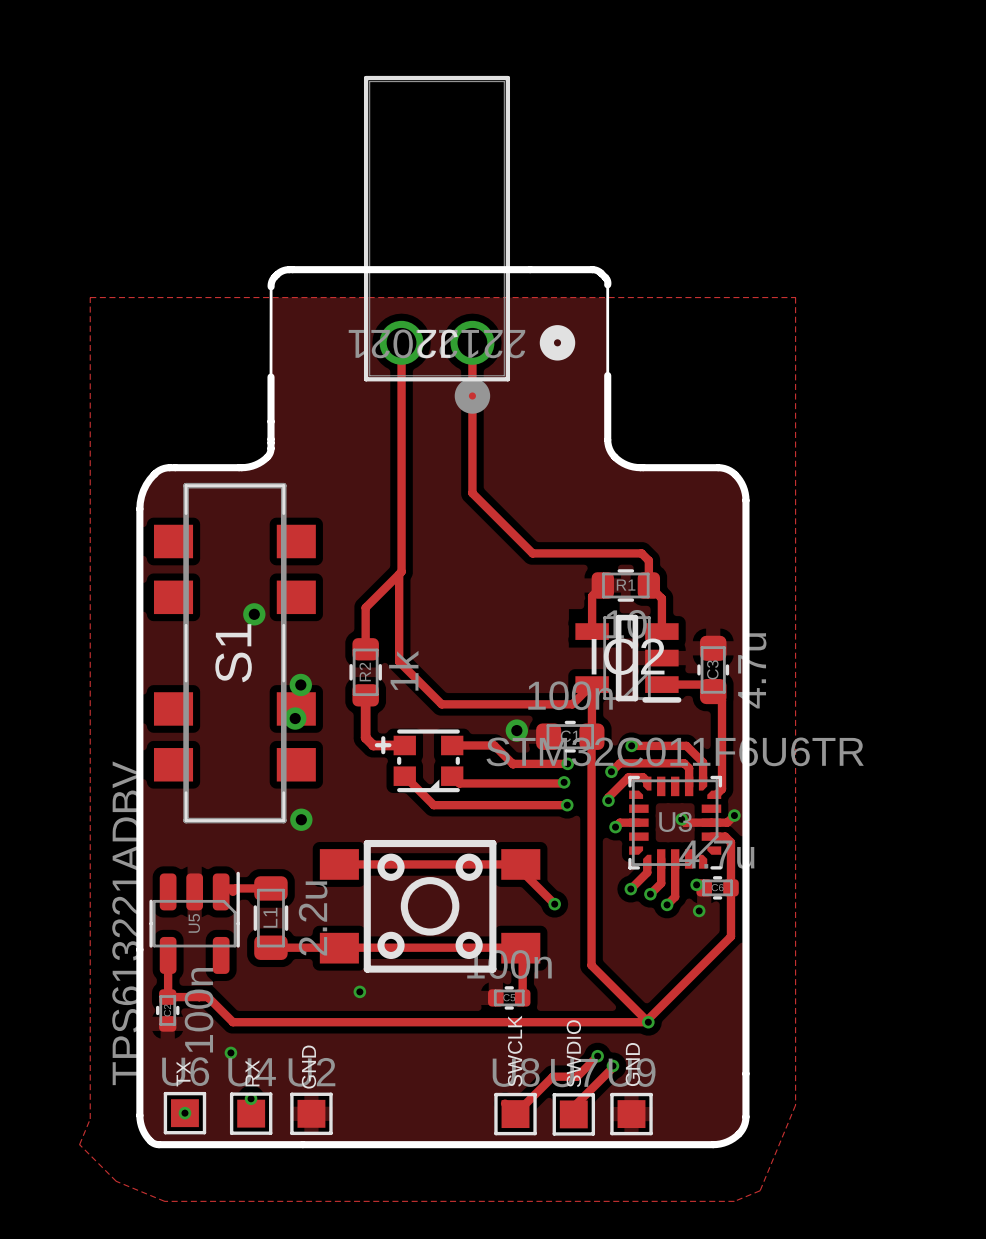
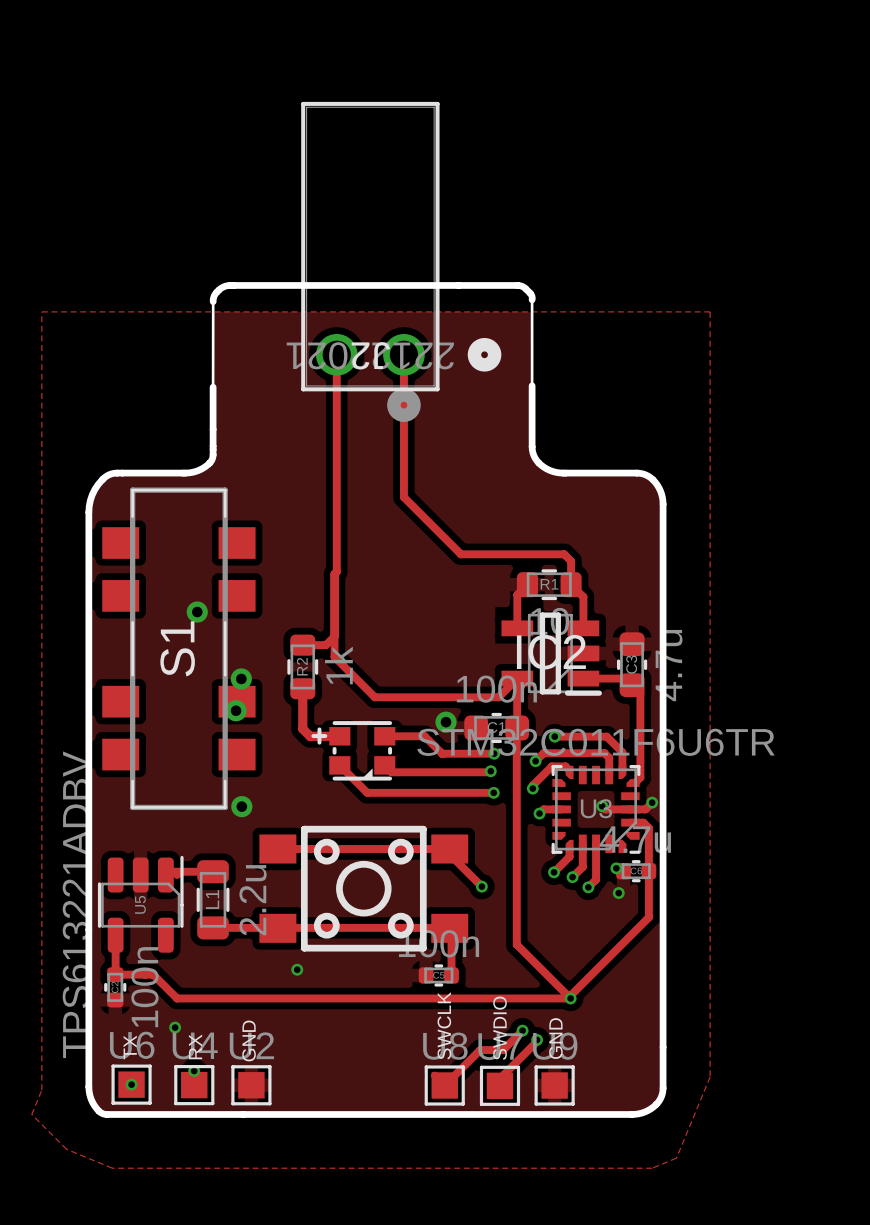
track: (399, 574) (365, 607) (365, 649) -> (334, 636) (325, 645) (302, 645)

